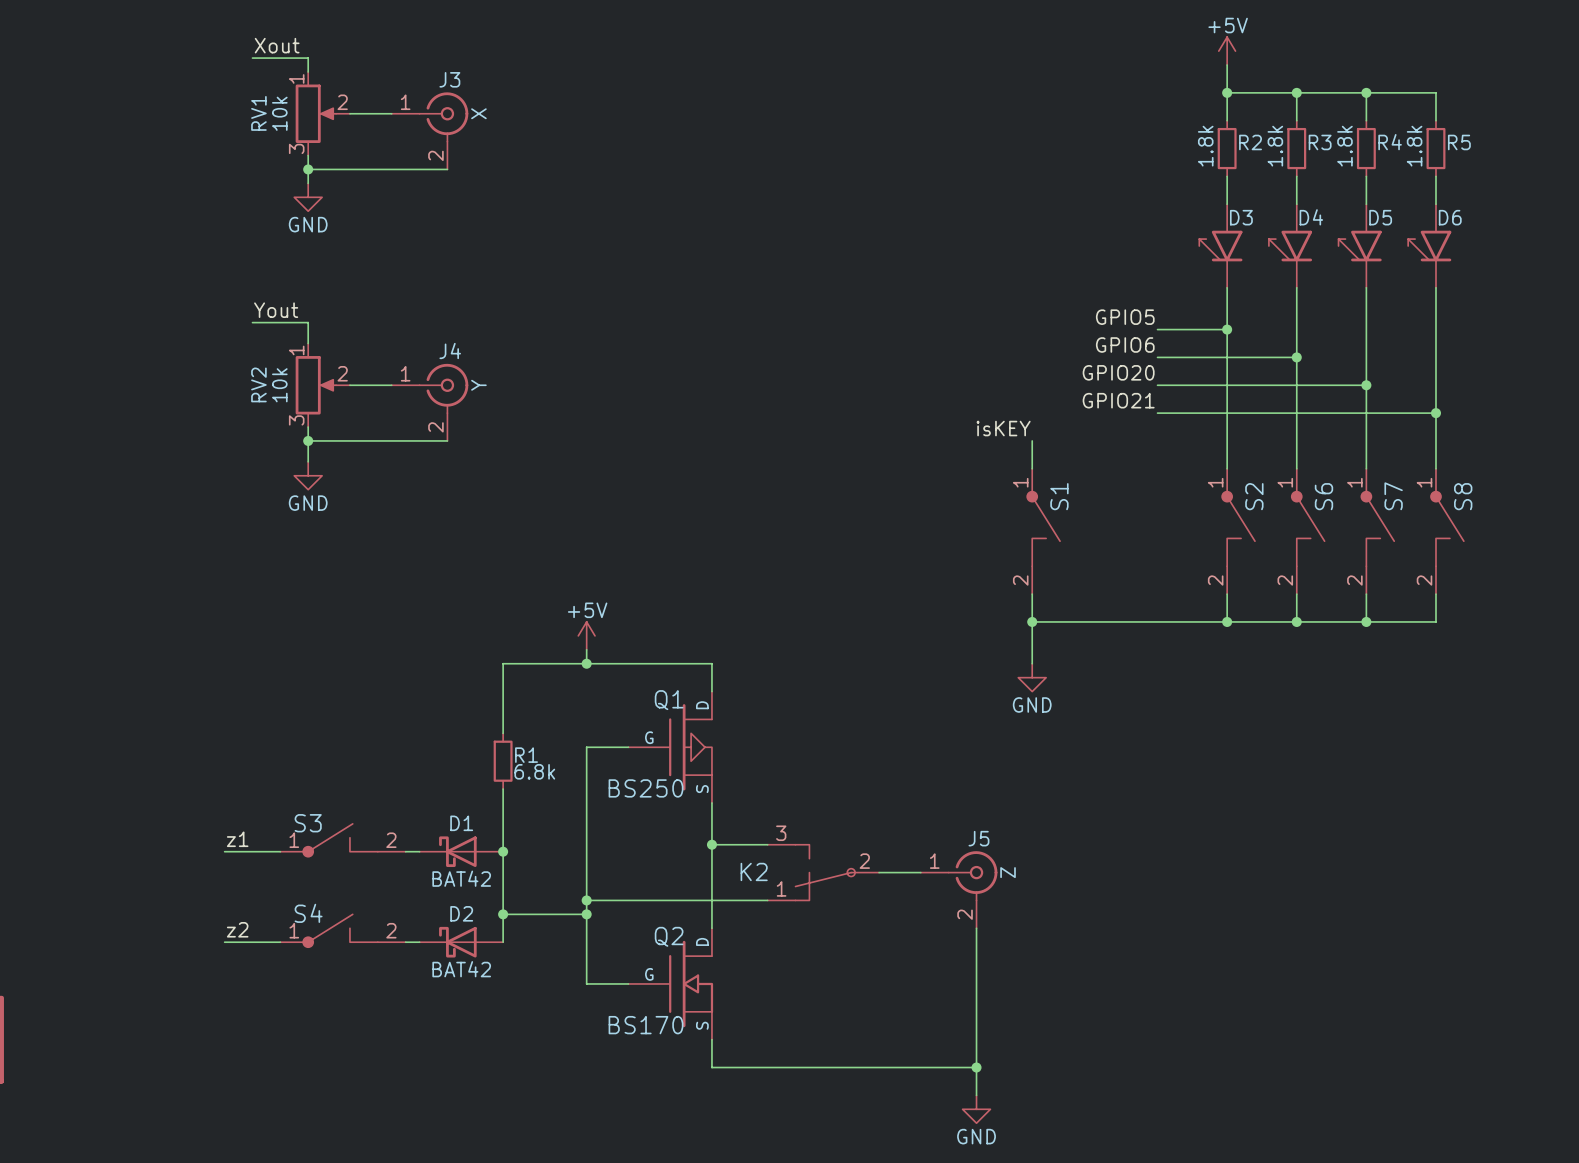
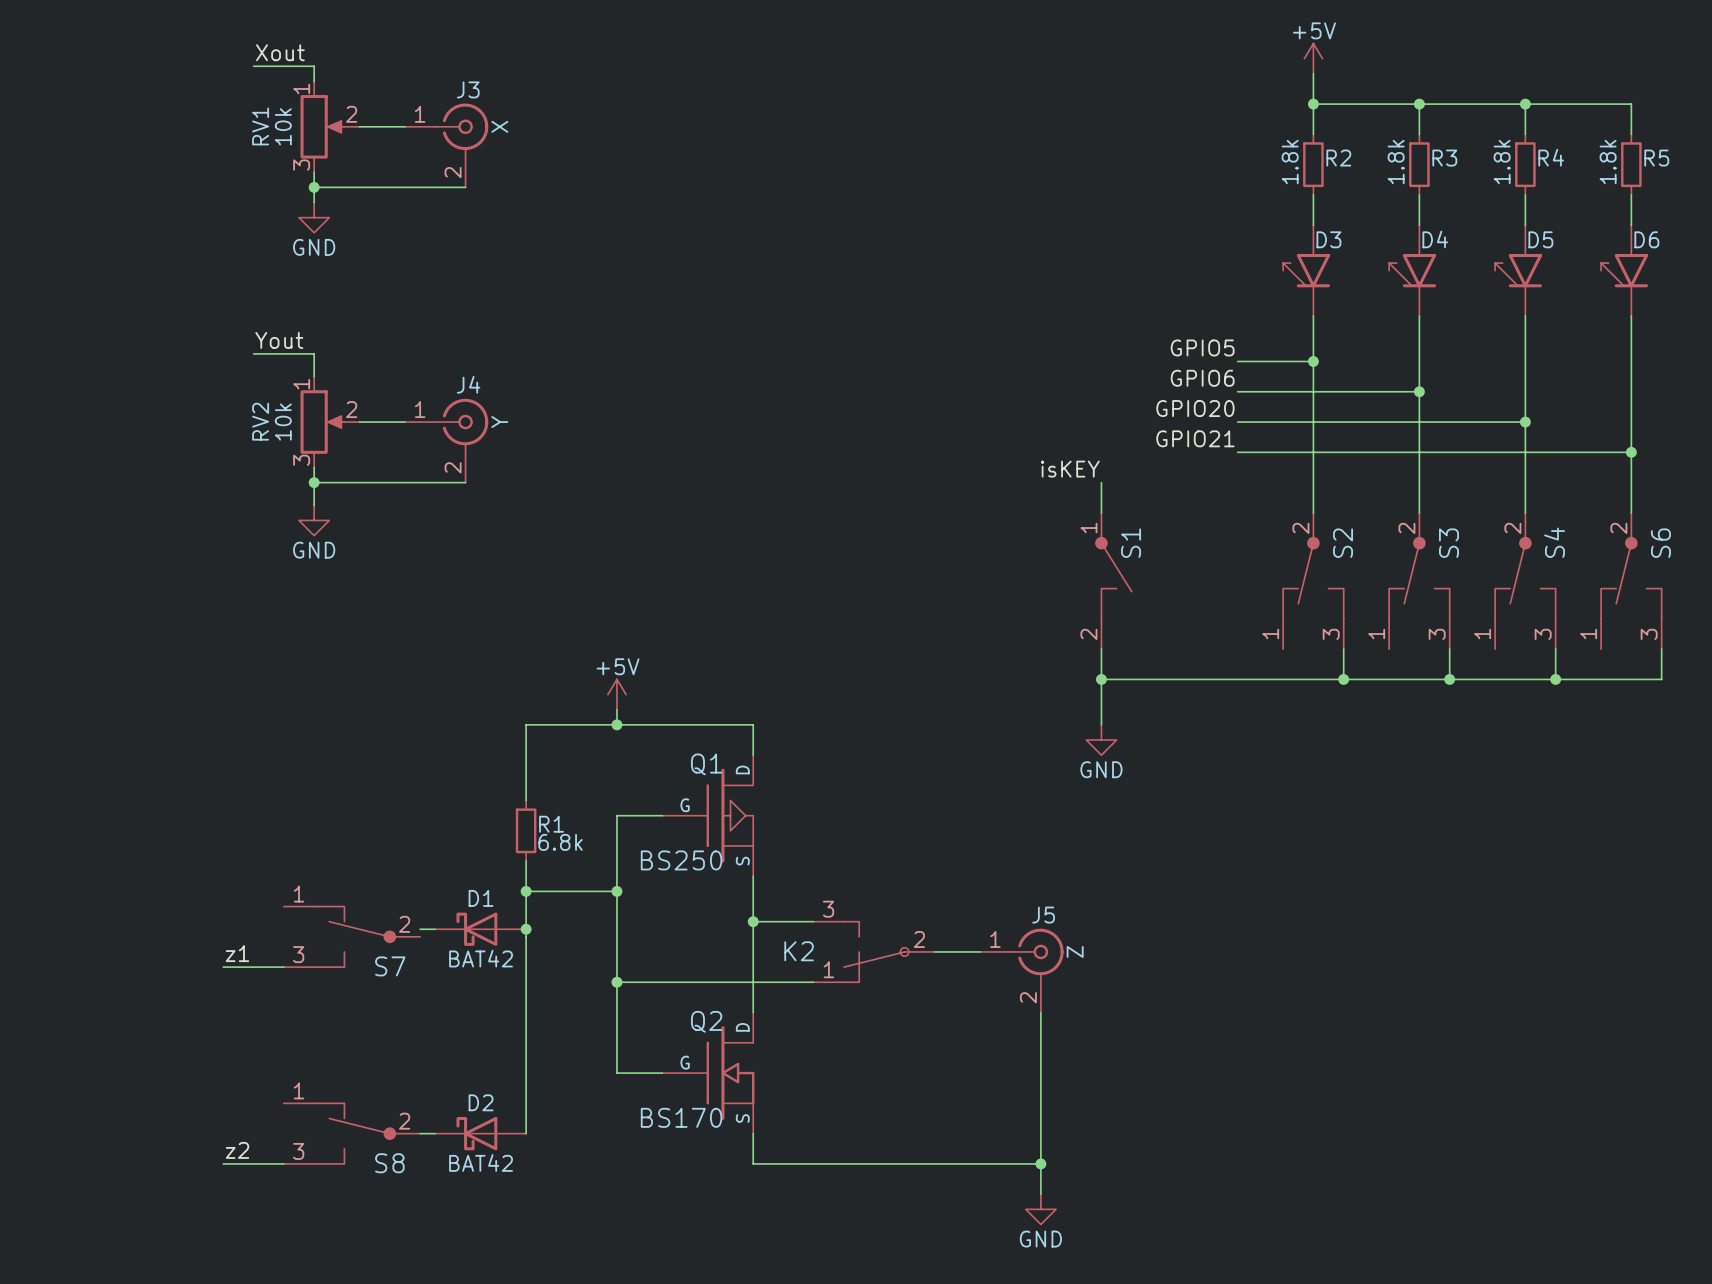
wire: (1296, 92) (1296, 120) -> (1419, 104) (1419, 134)
junction: (1296, 92) -> none
junction: none -> (1419, 104)
wire: (1366, 92) (1366, 120) -> (1525, 104) (1525, 134)
junction: (1366, 92) -> none
junction: none -> (1525, 104)
wire: (1435, 92) (1435, 120) -> (1540, 104) (1631, 104) (1631, 134)
R3 position: (1296, 148) -> (1419, 164)
R4 position: (1366, 148) -> (1525, 164)
R5 position: (1435, 148) -> (1631, 164)
wire: (1296, 176) (1296, 204) -> (1419, 194) (1419, 225)
wire: (1366, 176) (1366, 204) -> (1631, 194) (1631, 225)
wire: (1435, 176) (1435, 204) -> (1525, 194) (1525, 225)
D4 position: (1290, 246) -> (1412, 270)
D5 position: (1360, 246) -> (1518, 270)
D6 position: (1429, 246) -> (1624, 270)
wire: (1296, 287) (1296, 468) -> (1419, 316) (1419, 512)
wire: (1366, 287) (1366, 468) -> (1631, 316) (1631, 512)
wire: (1435, 287) (1435, 468) -> (1525, 316) (1525, 512)
wire: none -> (1389, 391) (1419, 391)
junction: (1296, 357) -> none
junction: none -> (1419, 391)
wire: none -> (1464, 422) (1525, 422)
junction: (1366, 385) -> none
junction: none -> (1525, 422)
wire: none -> (1540, 452) (1631, 452)
junction: (1435, 413) -> none
junction: none -> (1631, 452)
S2 symbol: [1222, 468, 1255, 595] -> [1283, 512, 1344, 650]
S6 symbol: [1291, 468, 1325, 595] -> [1601, 512, 1662, 650]
S7 symbol: [1361, 468, 1395, 595] -> [283, 906, 421, 968]
S8 symbol: [1430, 468, 1464, 595] -> [283, 1103, 421, 1164]
S7 name position: S7 (1393, 496) -> S7 (390, 966)
S8 name position: S8 (1463, 496) -> S8 (389, 1163)
wire: (1227, 594) (1227, 621) -> (1343, 649) (1343, 679)
wire: (1296, 594) (1296, 621) -> (1555, 649) (1555, 679)
wire: (1366, 594) (1366, 621) -> (1449, 649) (1449, 679)
wire: (1435, 594) (1435, 621) -> (1661, 649) (1661, 679) (1540, 679)
junction: (1227, 621) -> none
junction: none -> (1343, 679)
junction: (1296, 621) -> none
junction position: (1366, 621) -> (1449, 679)
junction: none -> (1555, 679)
junction: none -> (526, 891)
junction: none -> (616, 891)
S3 symbol: [280, 823, 406, 857] -> [1389, 512, 1450, 650]
S3 name position: S3 (308, 823) -> S3 (1449, 543)
label position: z1 (237, 839) -> z1 (237, 953)
wire: (224, 851) (280, 851) -> (223, 967) (283, 967)
S4 name position: S4 (308, 913) -> S4 (1554, 542)
S4 symbol: [280, 914, 406, 948] -> [1495, 512, 1556, 650]
wire: (503, 914) (586, 914) -> (526, 891) (616, 891)
junction: (503, 914) -> none
junction: (586, 914) -> none
label position: z2 (237, 929) -> z2 (237, 1150)
wire: (224, 942) (280, 942) -> (223, 1163) (283, 1163)
wire: (405, 942) (419, 942) -> (420, 1133) (435, 1133)
D2 position: (461, 942) -> (480, 1133)
wire: none -> (526, 1027) (526, 1133)

